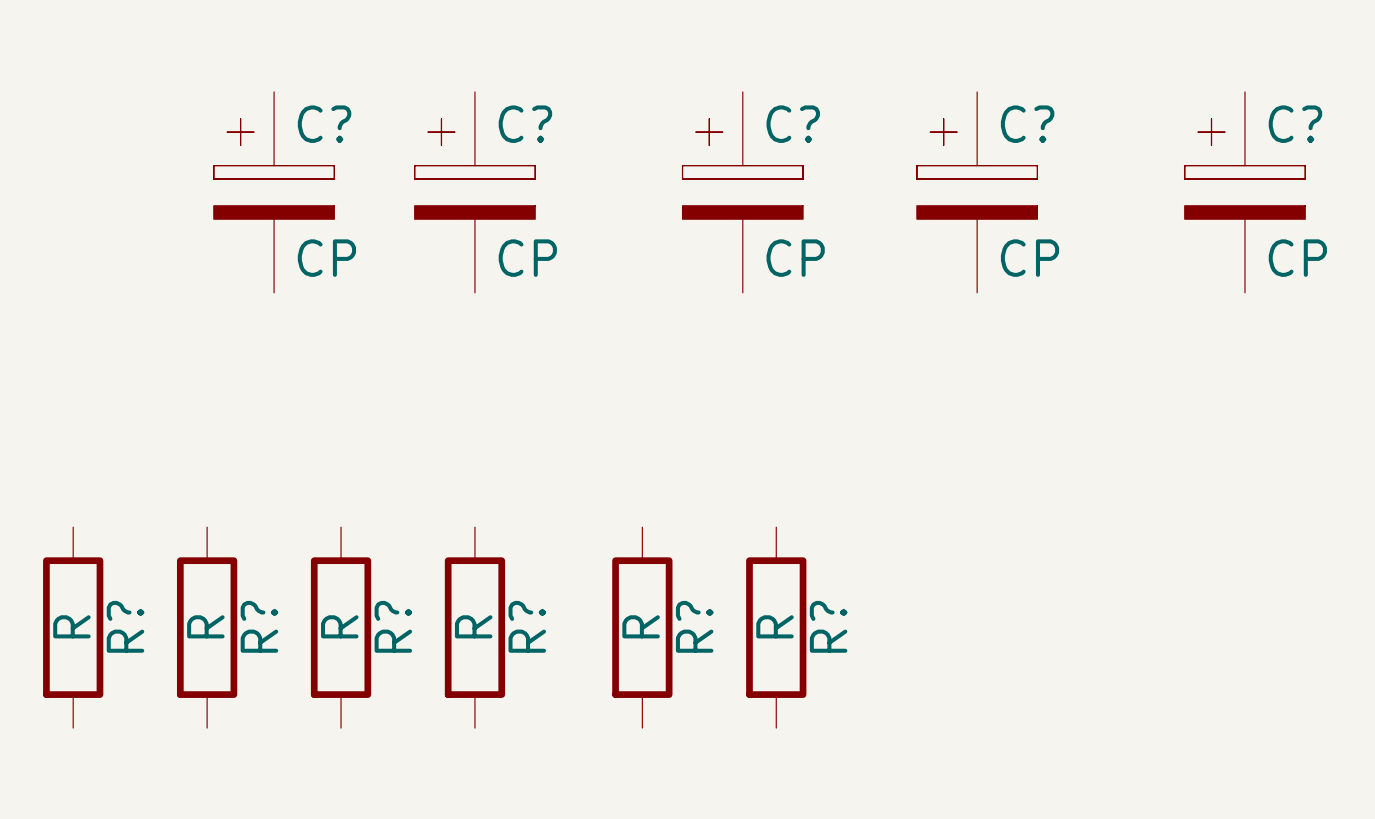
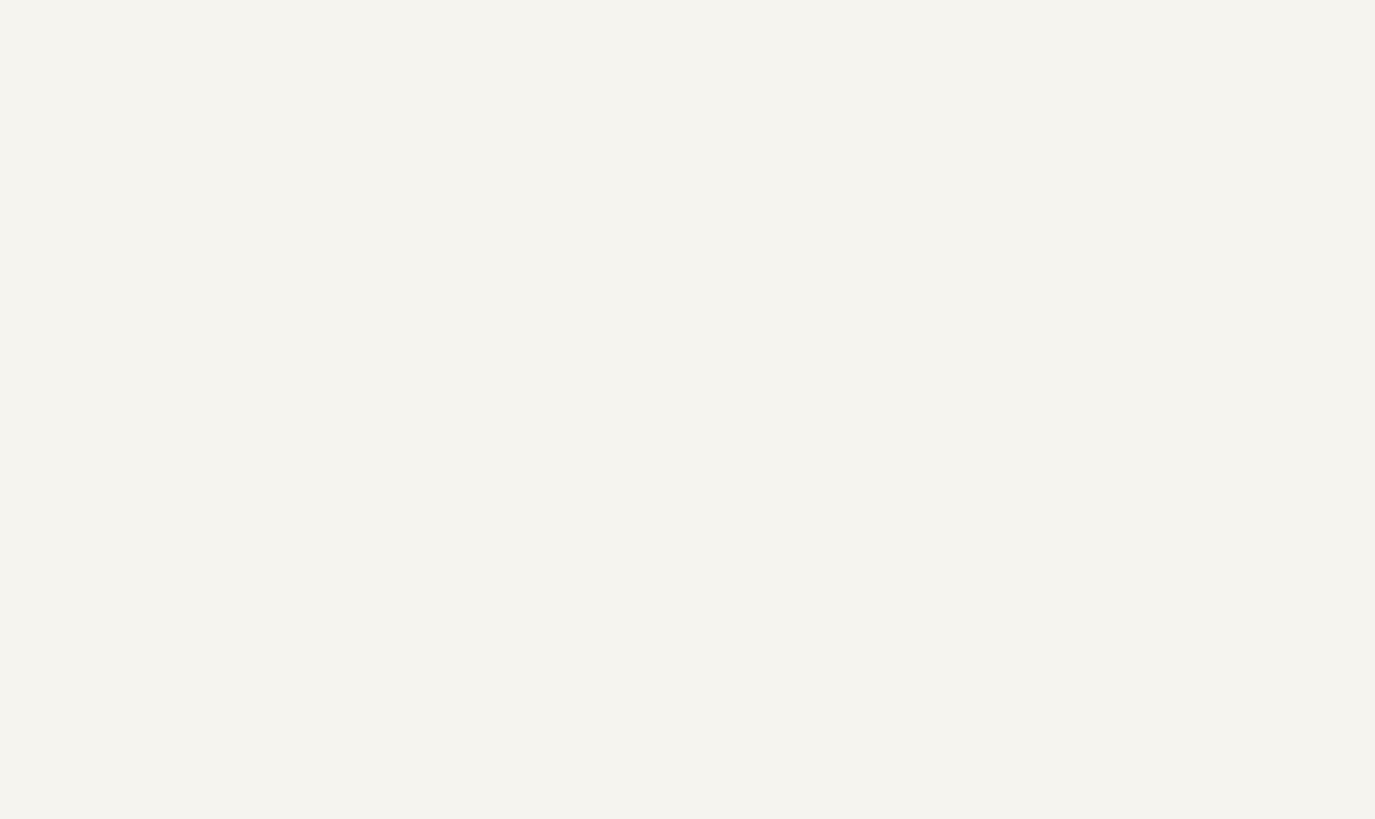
C?: CP (274, 192) -> none
C?: CP (474, 192) -> none
C?: CP (742, 192) -> none
C?: CP (977, 192) -> none
C?: CP (1244, 192) -> none
R?: R (73, 627) -> none
R?: R (207, 627) -> none
R?: R (341, 627) -> none
R?: R (474, 627) -> none
R?: R (642, 627) -> none
R?: R (776, 627) -> none

